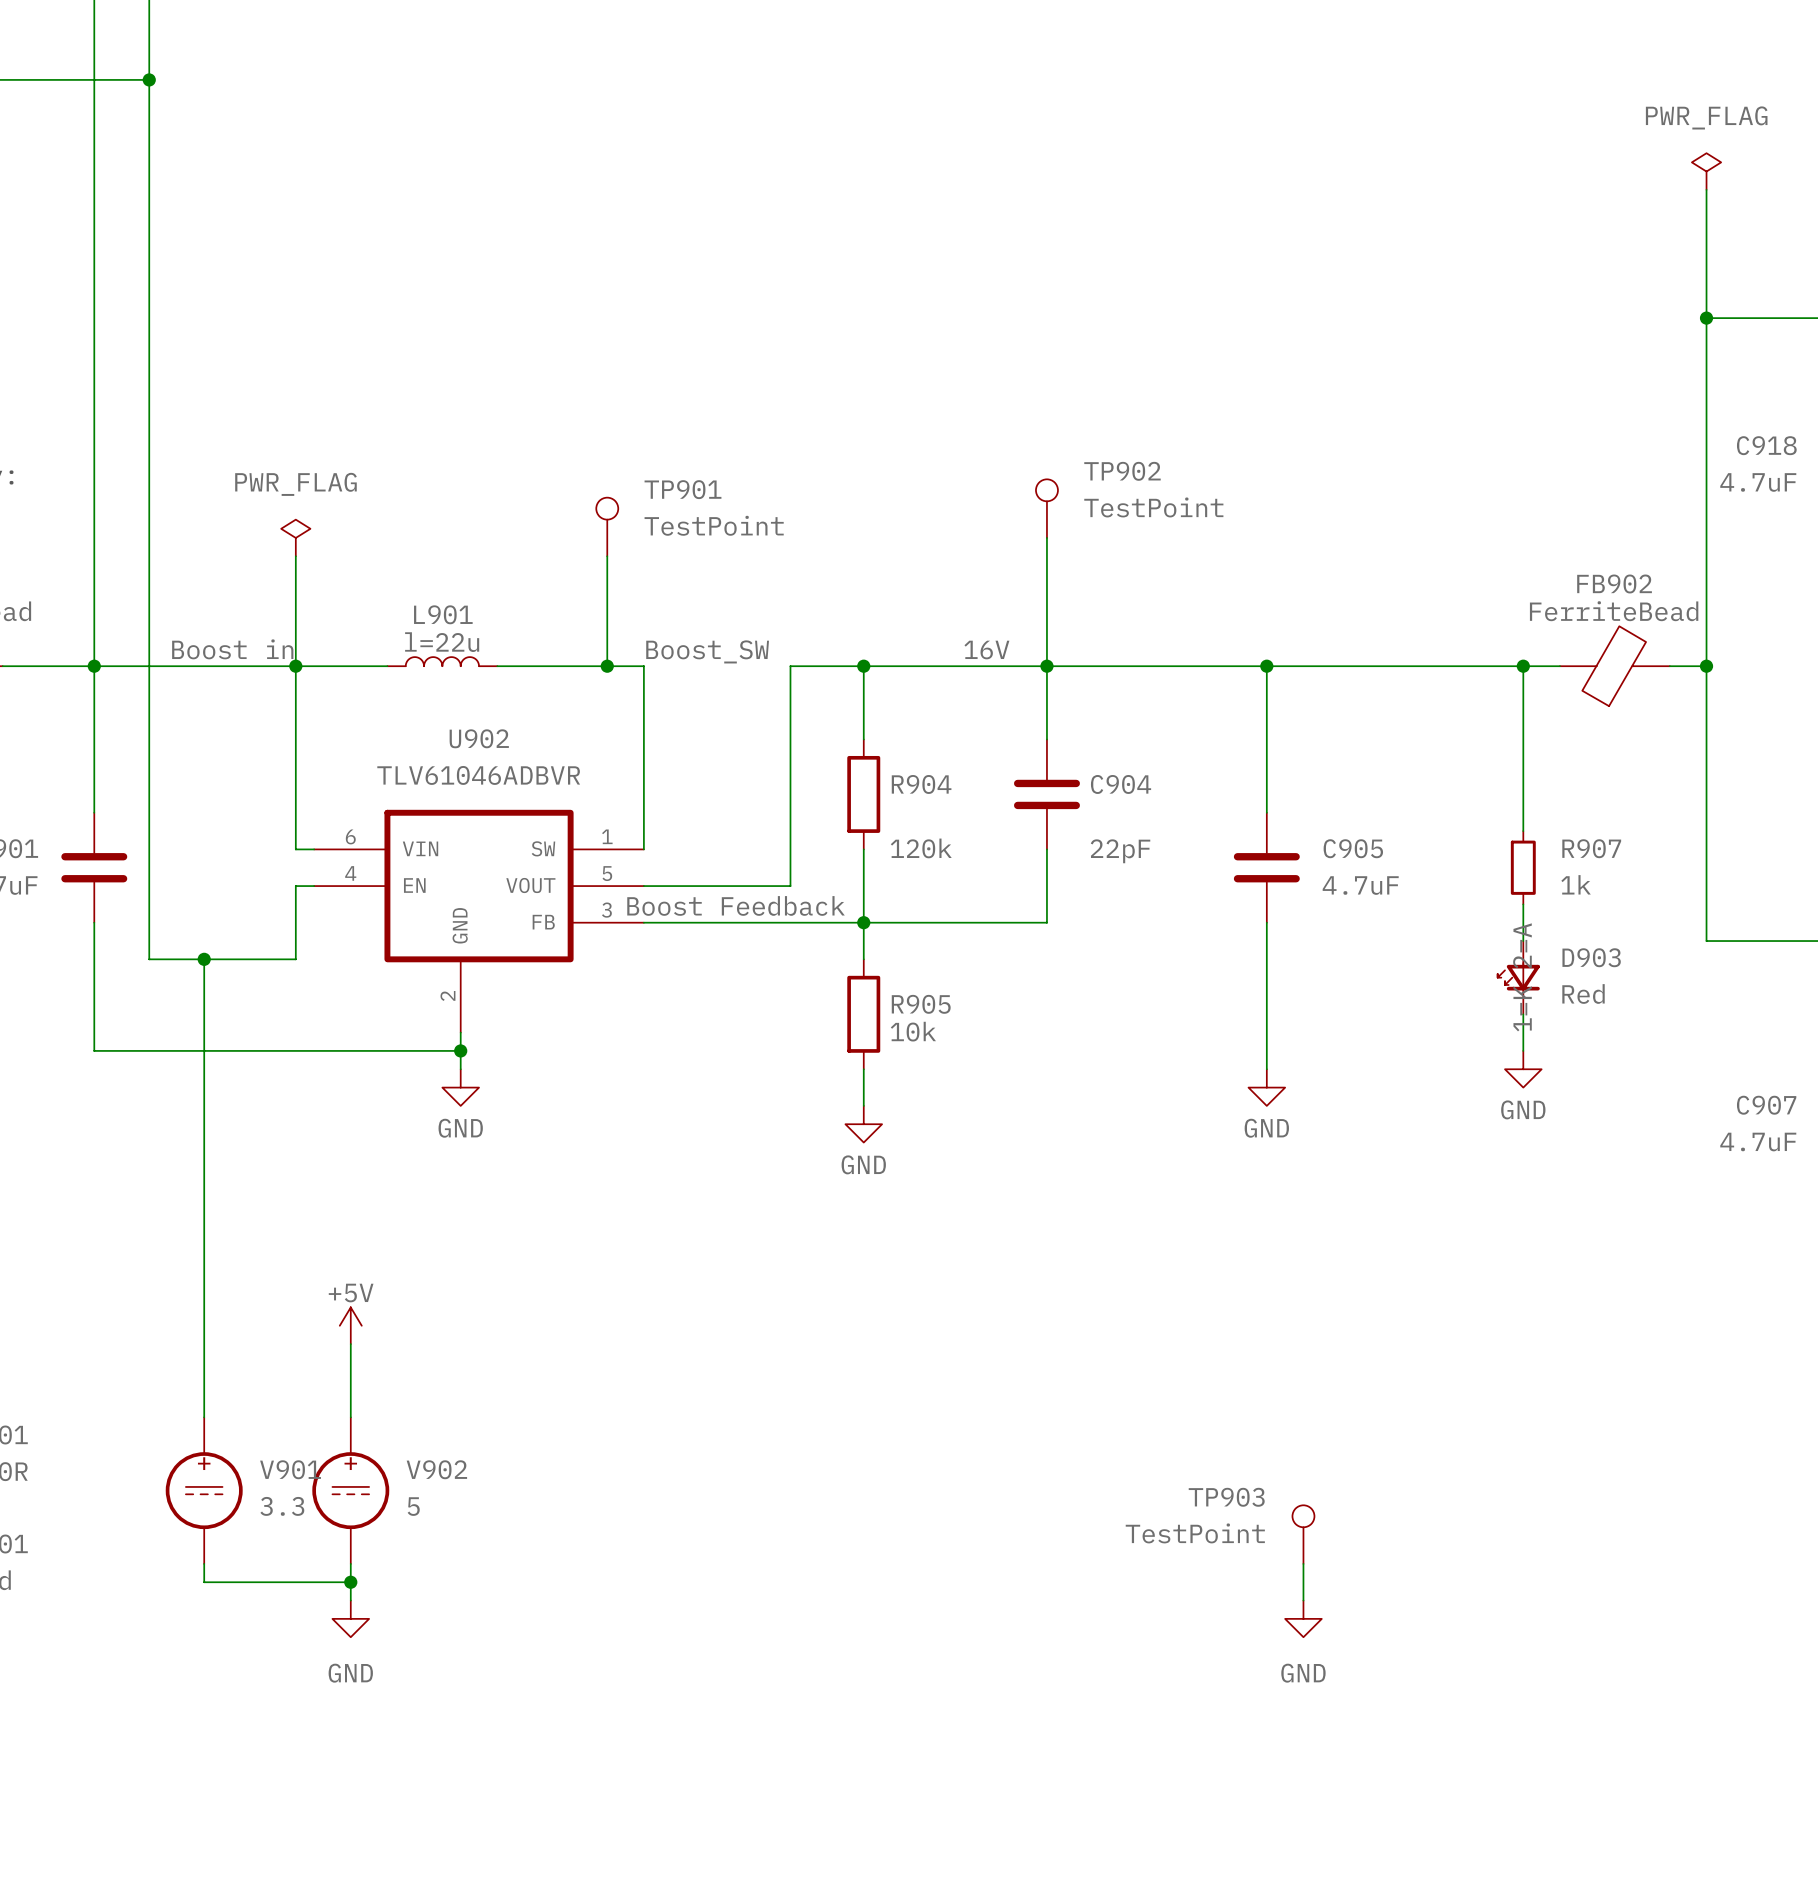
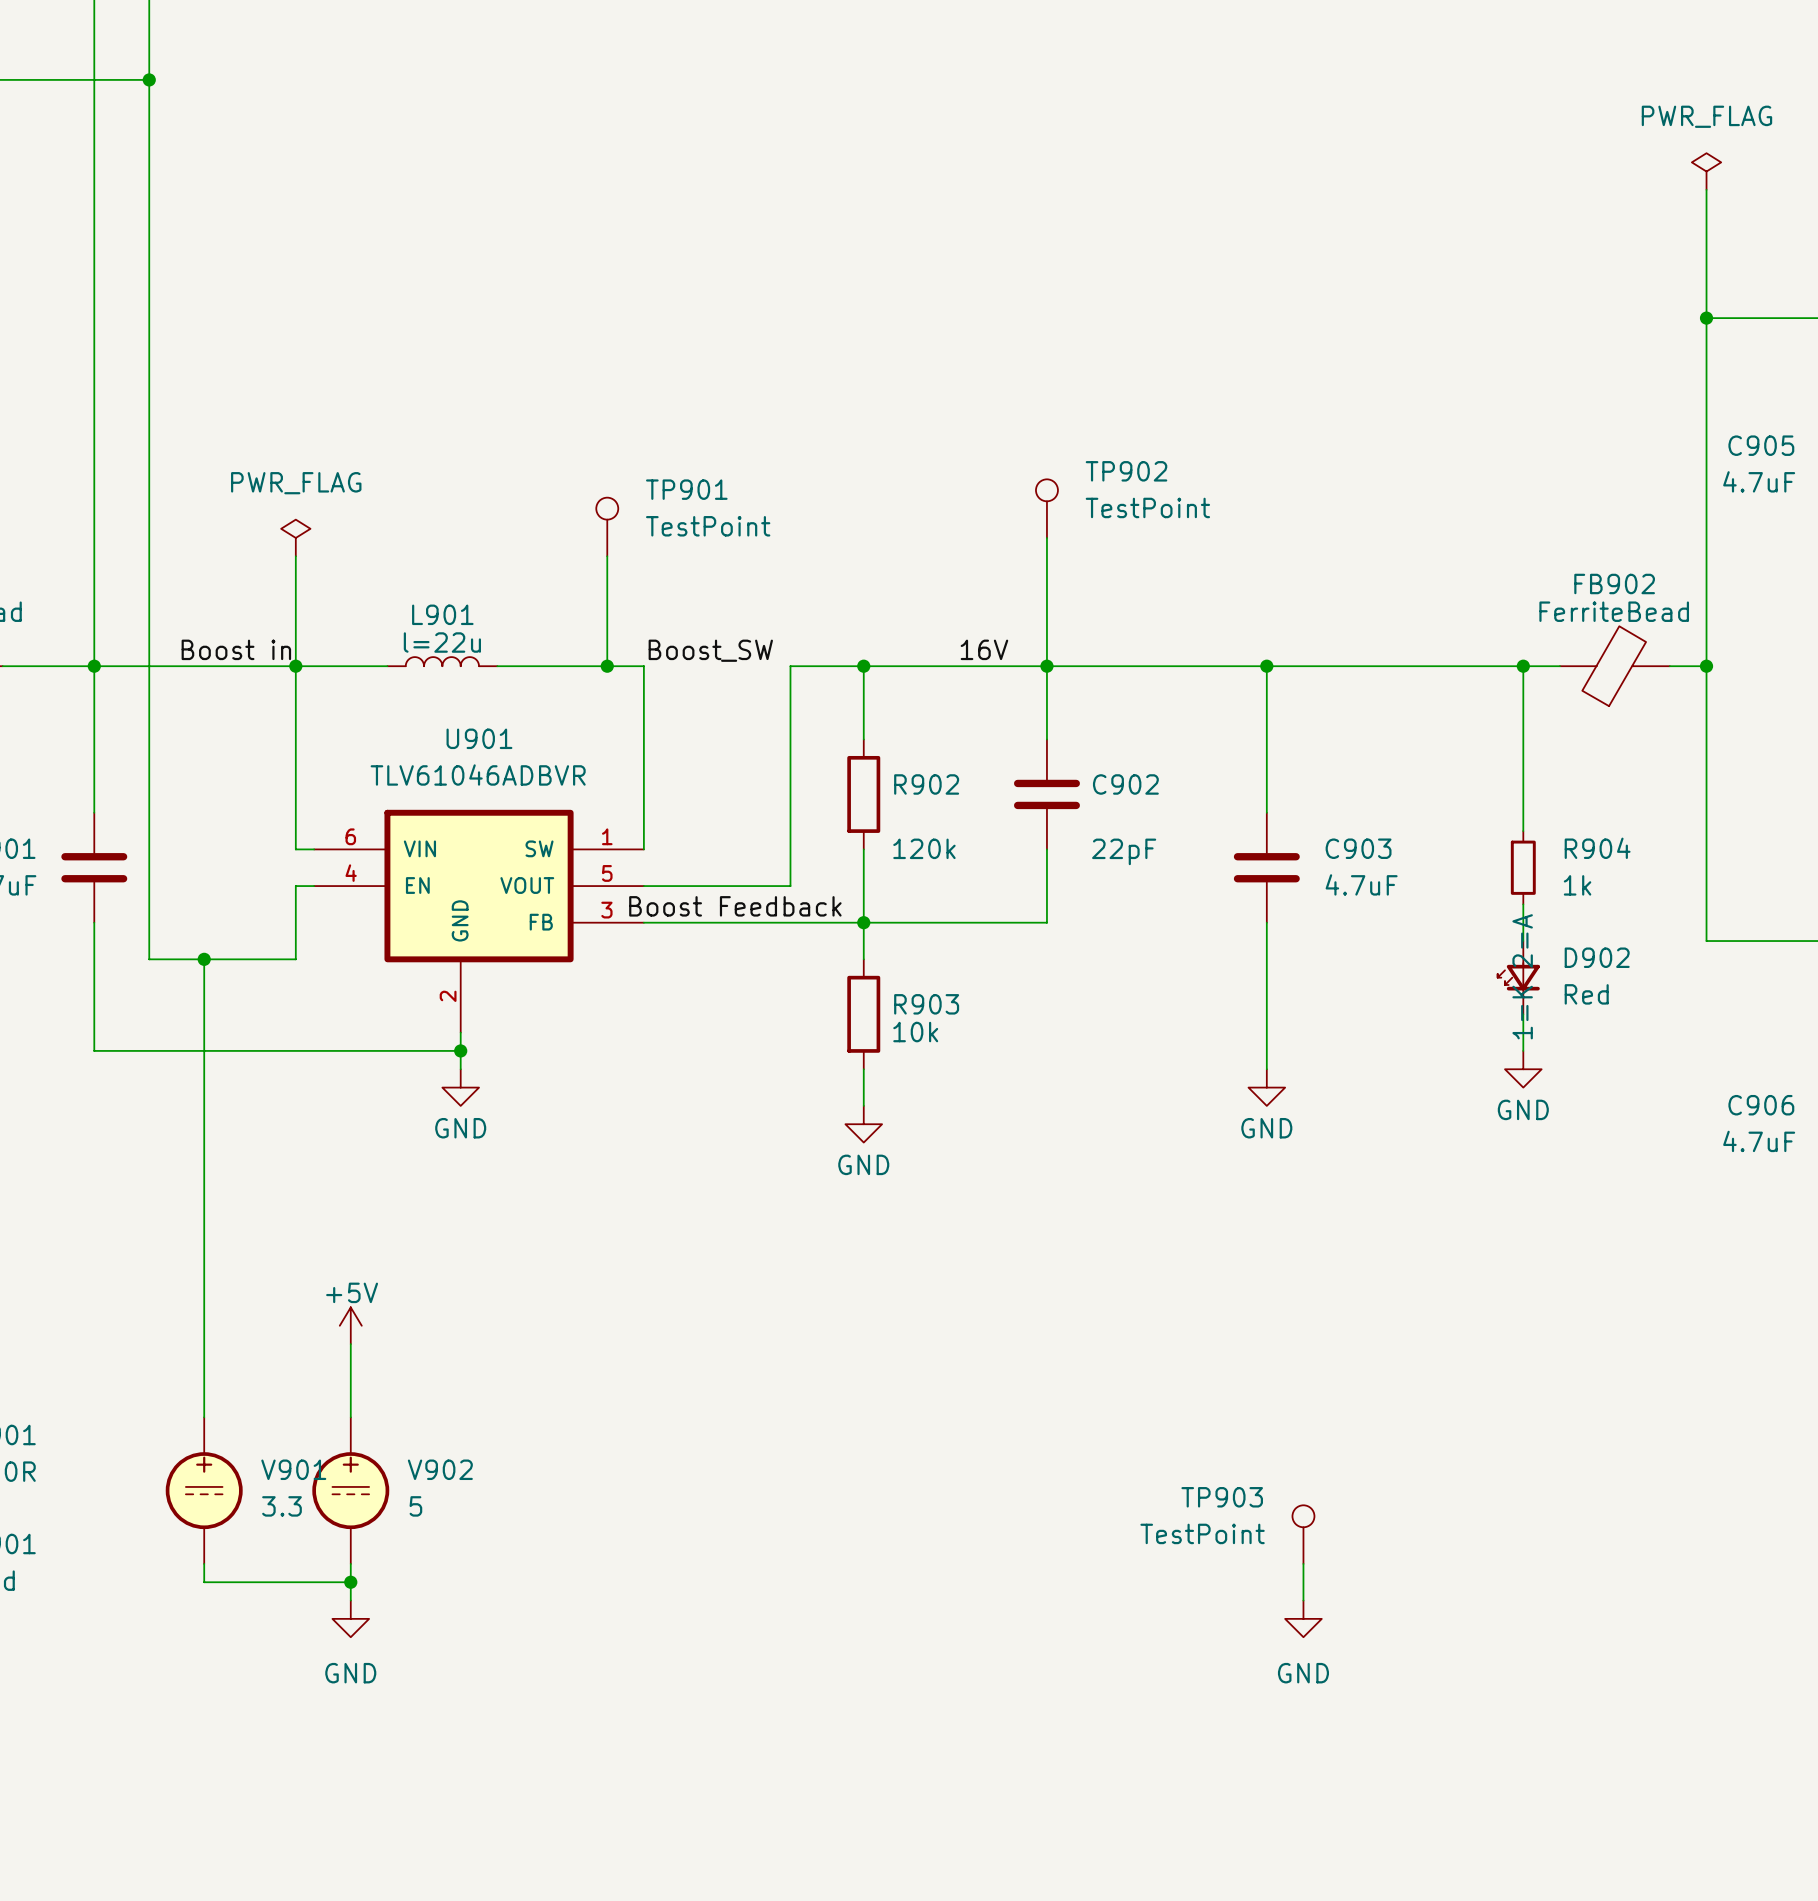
C918 name: C918 (1766, 445) -> C905 (1761, 445)
U902 name: U902 (479, 738) -> U901 (479, 738)
R904 name: R904 (921, 784) -> R902 (926, 784)
C904 name: C904 (1121, 784) -> C902 (1125, 784)
C905 name: C905 (1353, 848) -> C903 (1358, 848)
R907 name: R907 (1591, 848) -> R904 (1597, 848)
D903 name: D903 (1591, 957) -> D902 (1597, 957)
R905 name: R905 (921, 1004) -> R903 (926, 1004)
C907 name: C907 (1766, 1105) -> C906 (1761, 1105)

